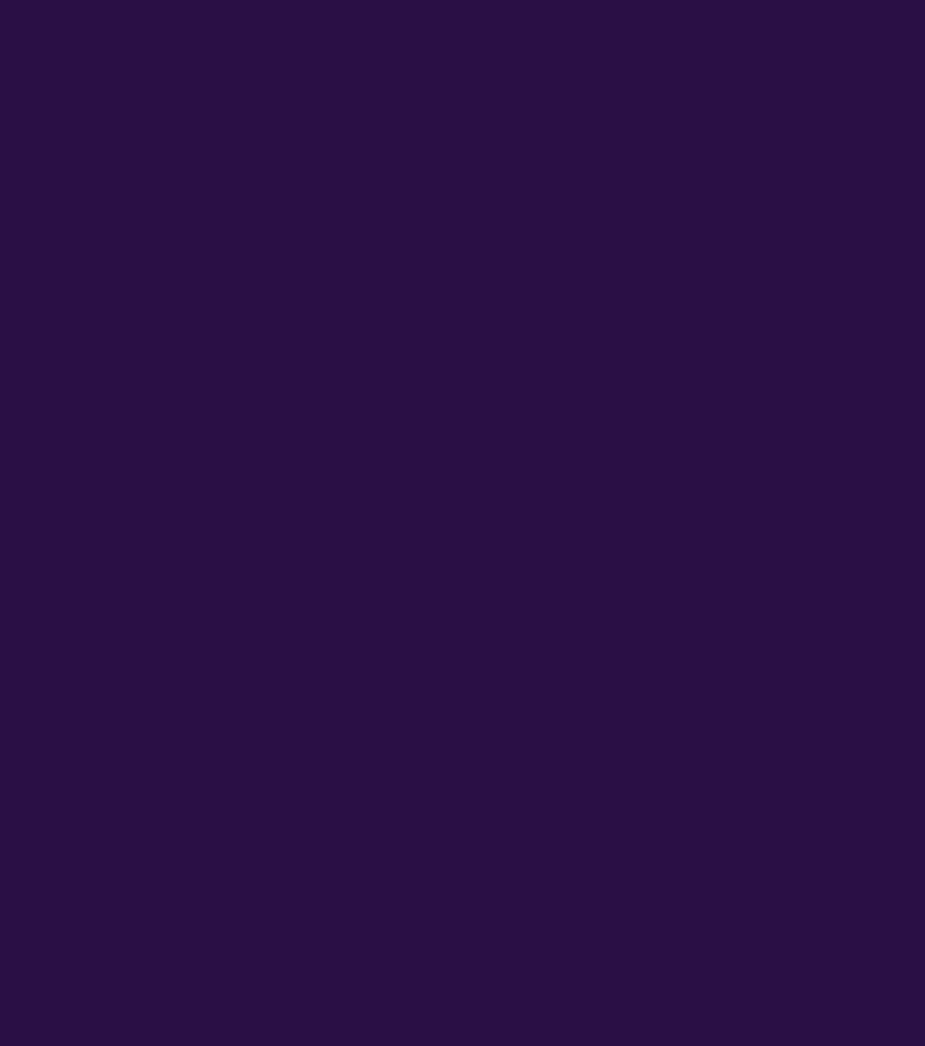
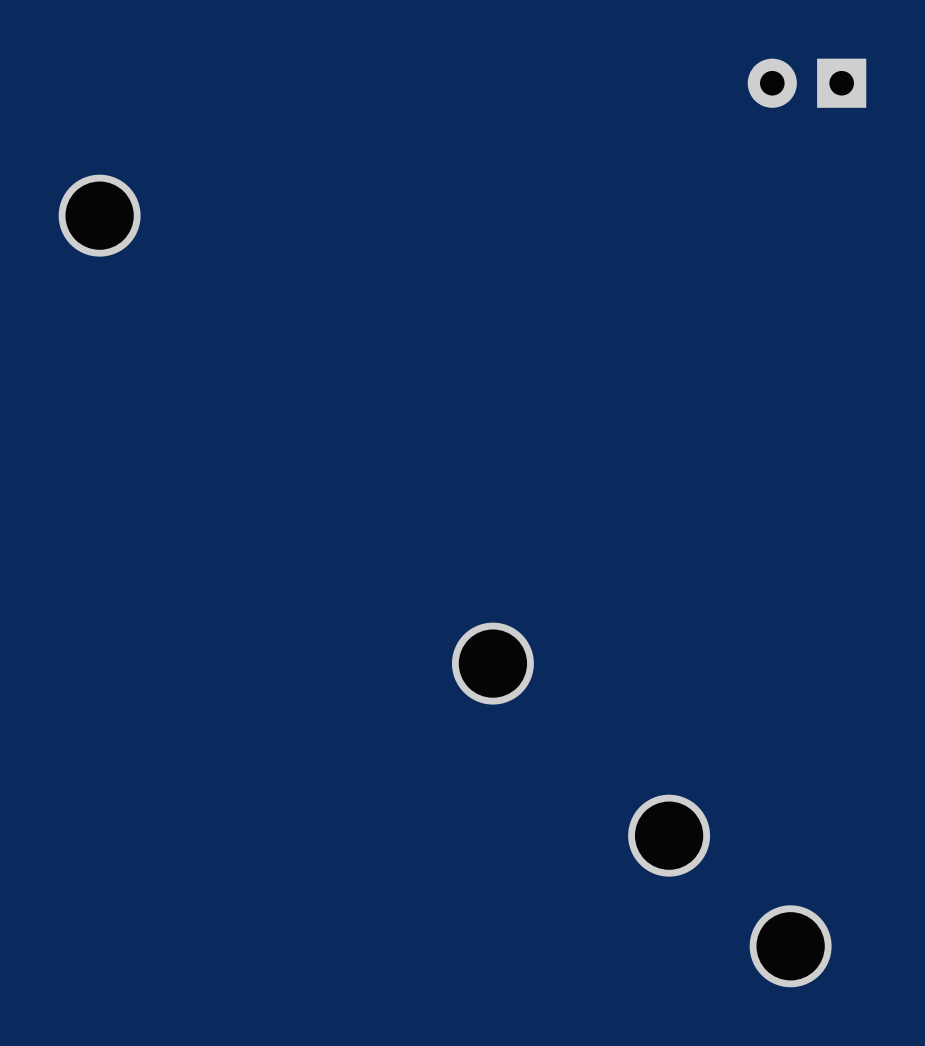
part: none -> (806, 83)
part: none -> (99, 215)
part: none -> (492, 663)
part: none -> (669, 835)
part: none -> (790, 946)

